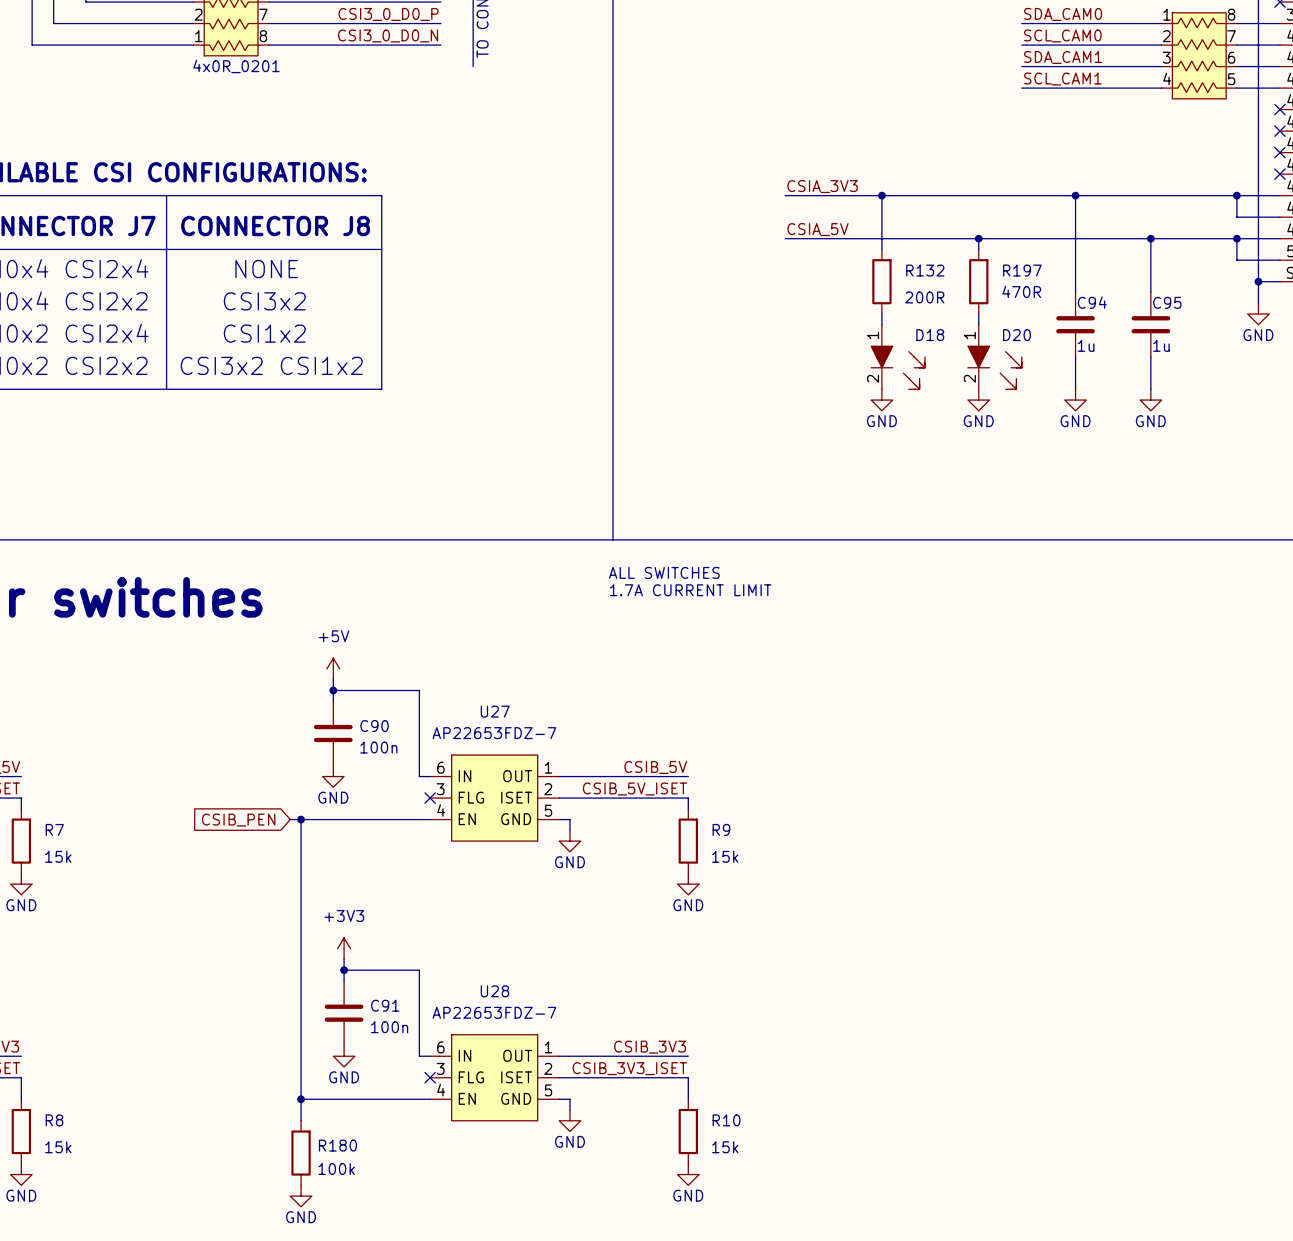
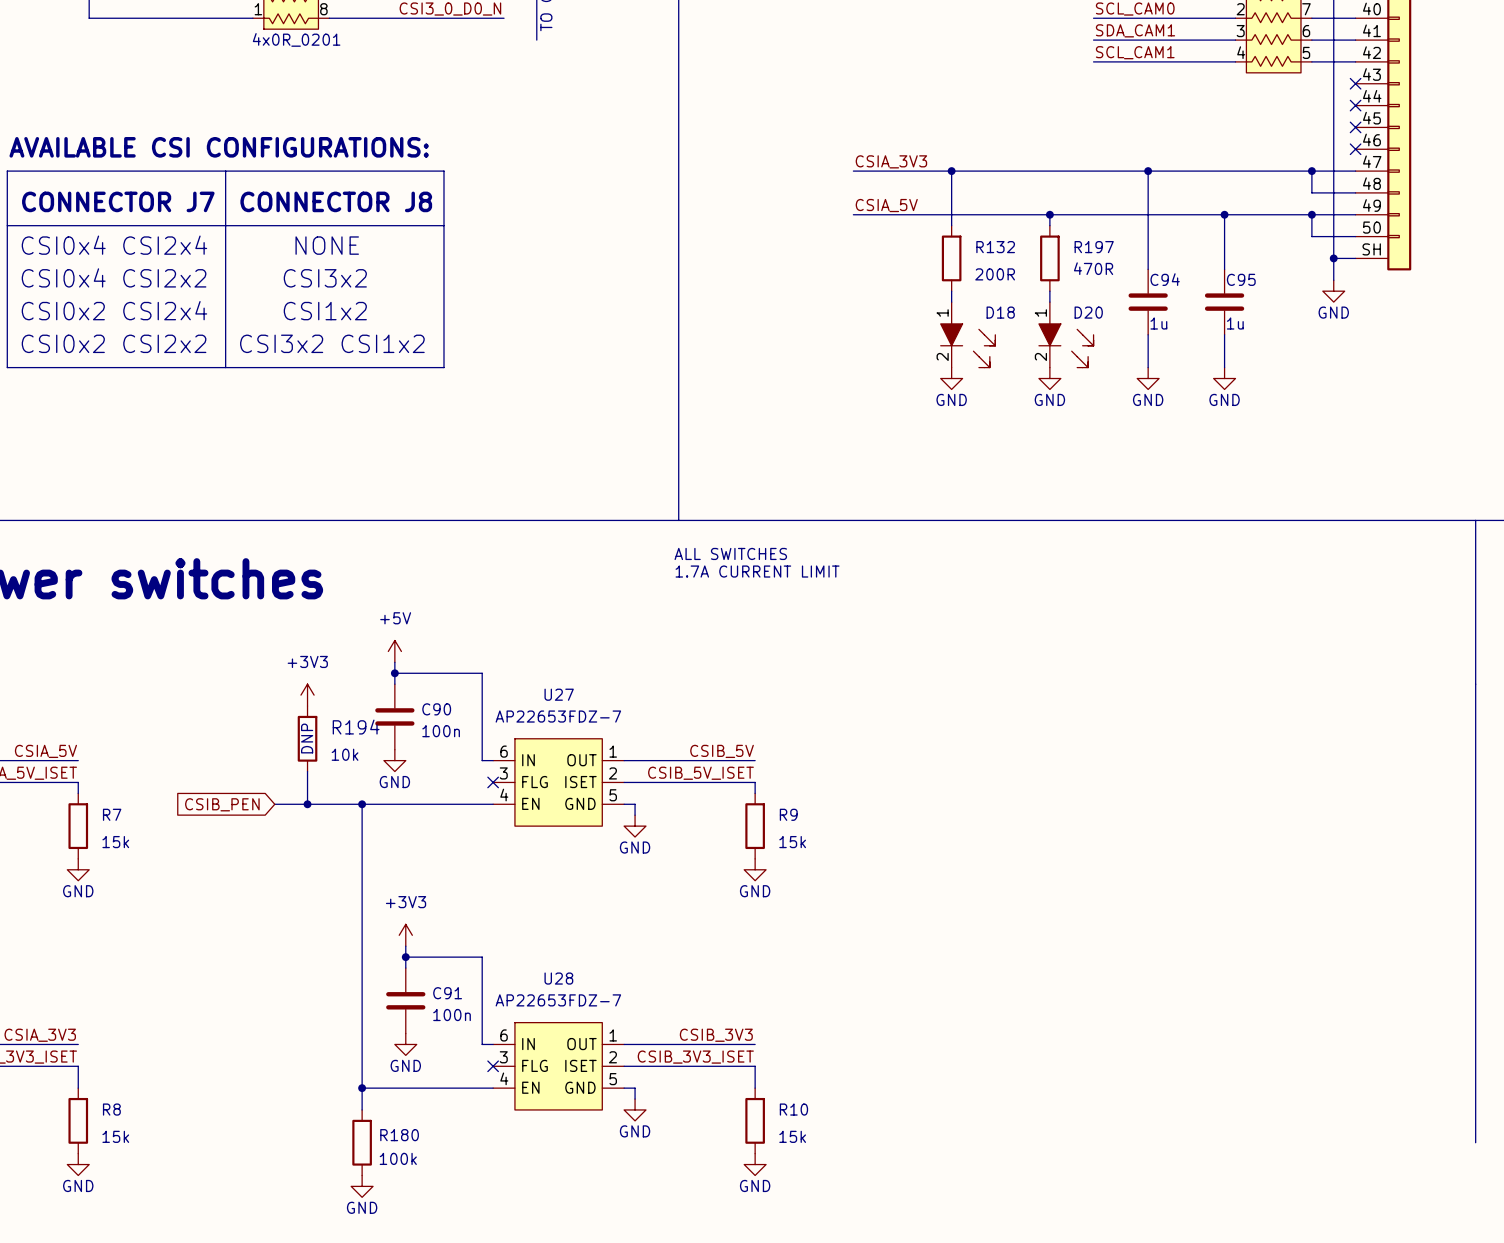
power symbol: none -> +3V3 (307, 695)
R194: none -> (307, 738)
wire: none -> (307, 771) (307, 804)
wire: none -> (274, 804) (351, 804)
junction: none -> (307, 804)
global label position: CSIB_PEN (238, 820) -> CSIB_PEN (222, 804)

